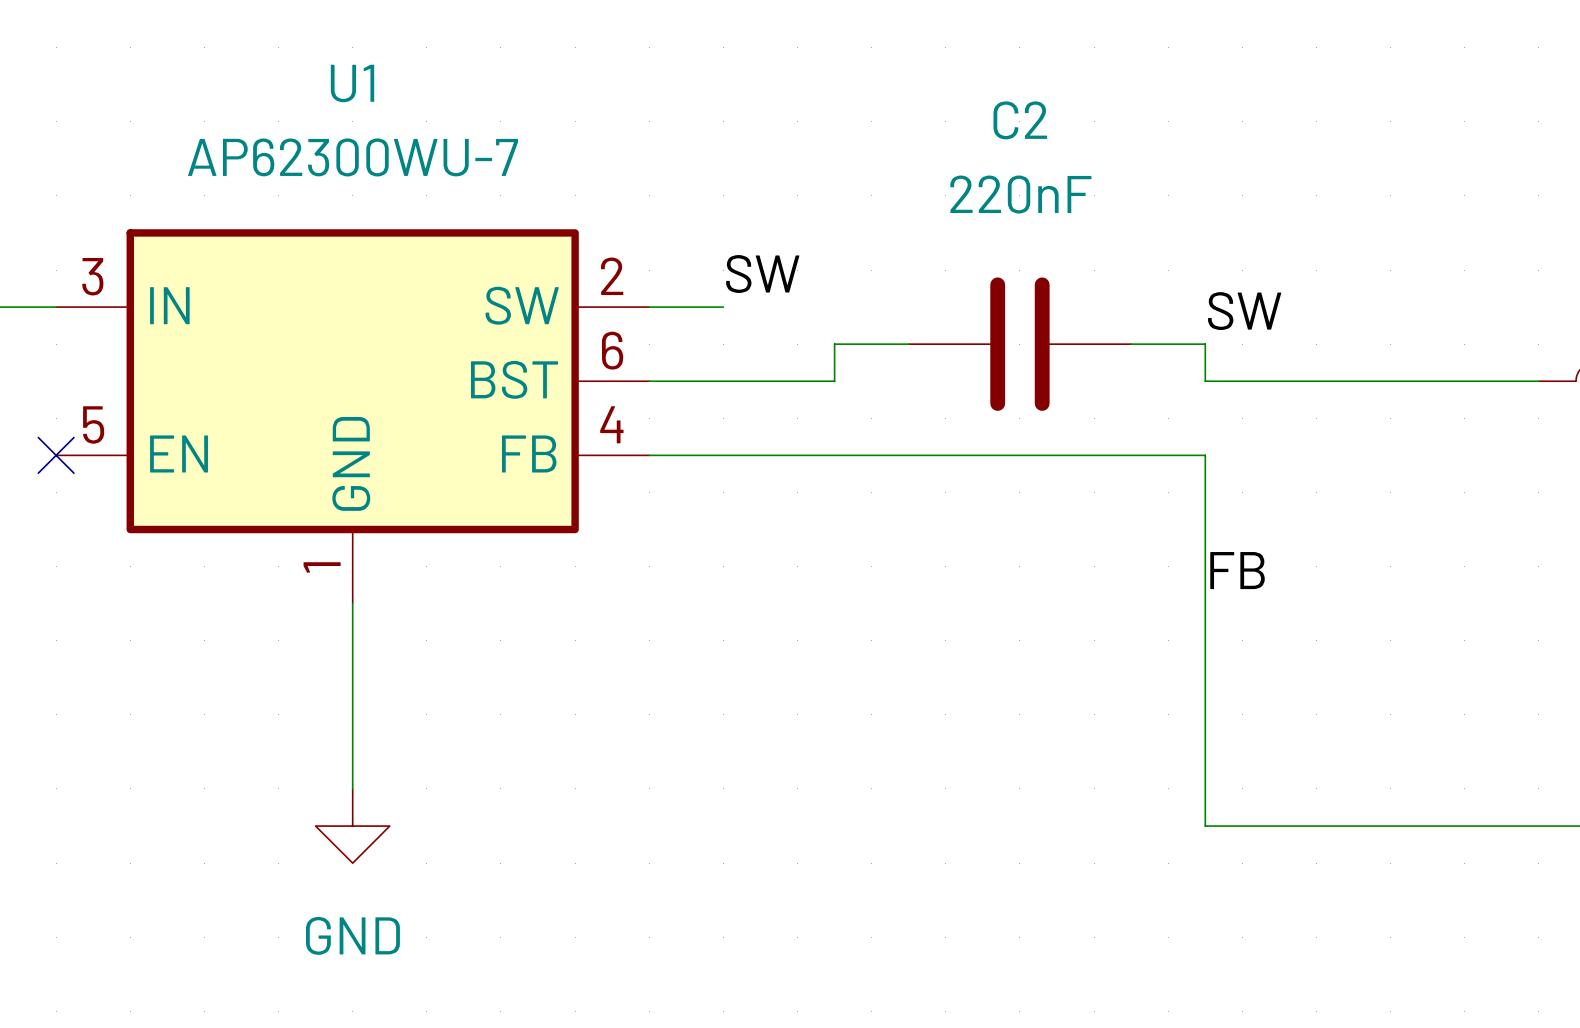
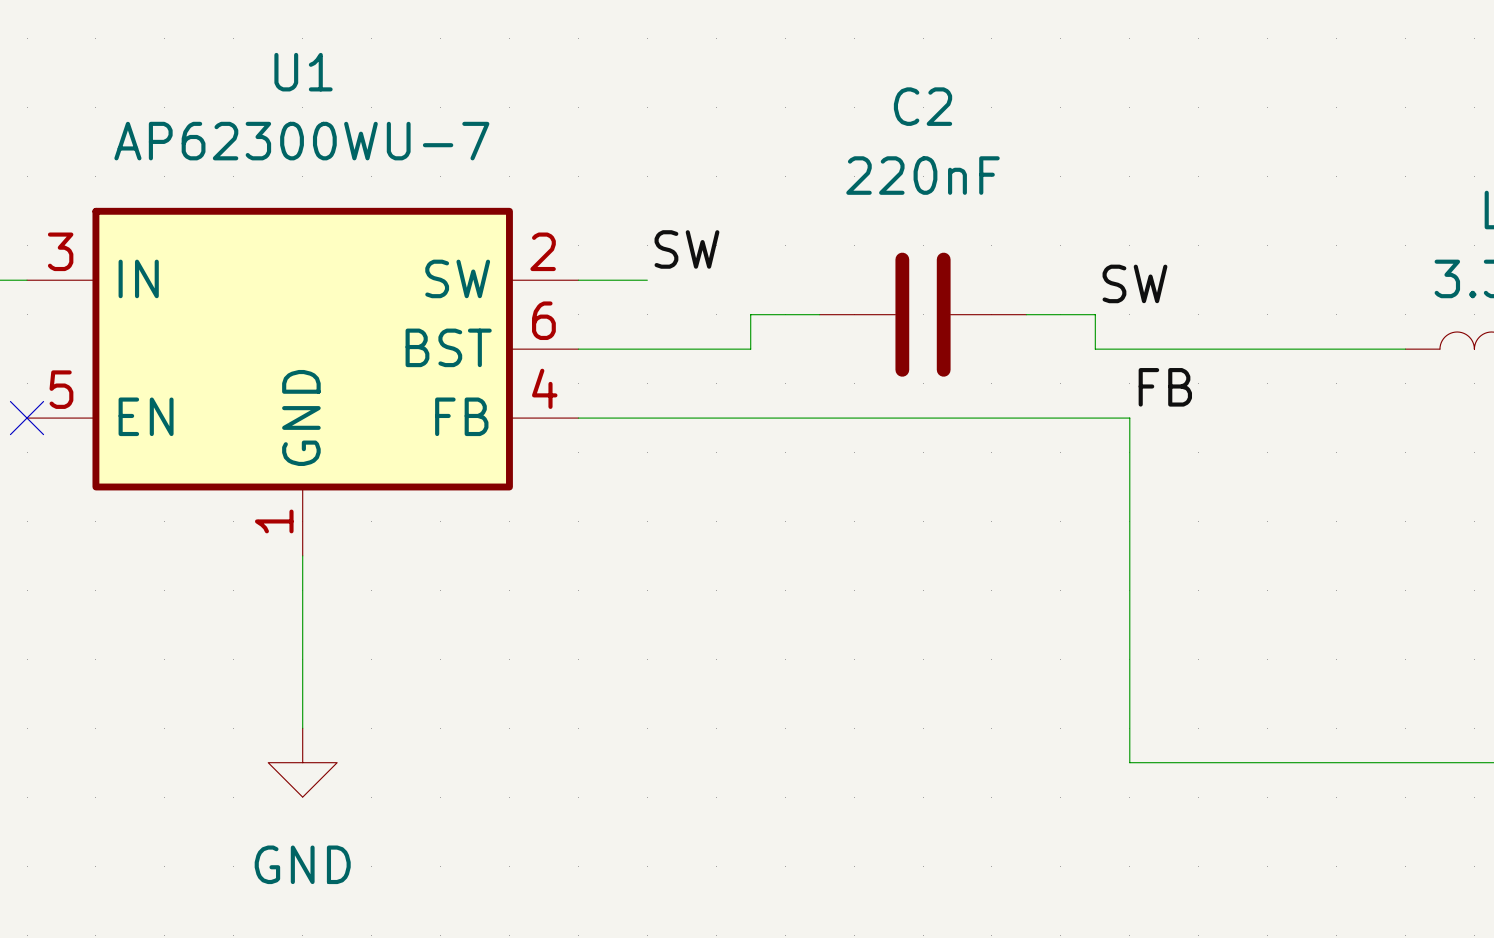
wire: (1205, 455) (1205, 826) (1242, 826) -> (1095, 418) (1129, 418) (1129, 762)
label position: FB (1237, 570) -> FB (1165, 387)

